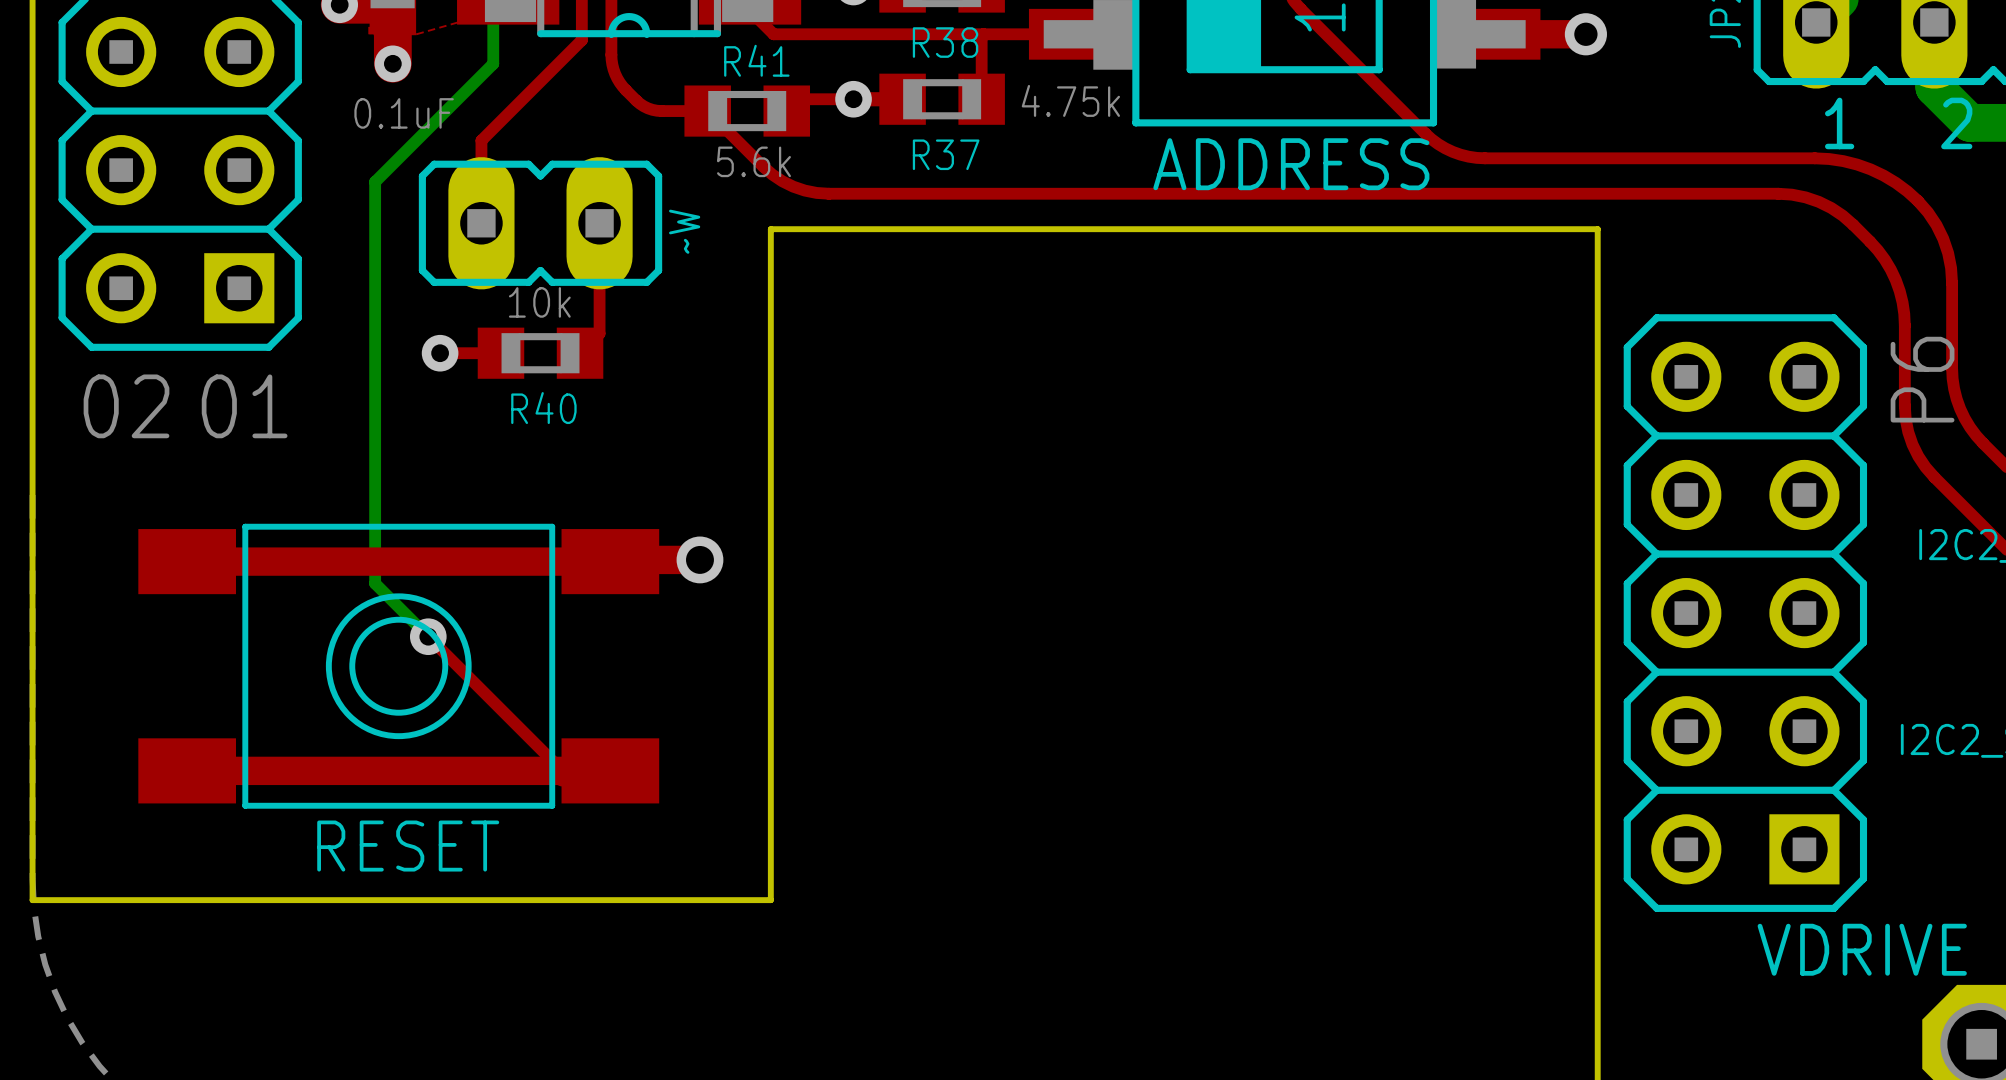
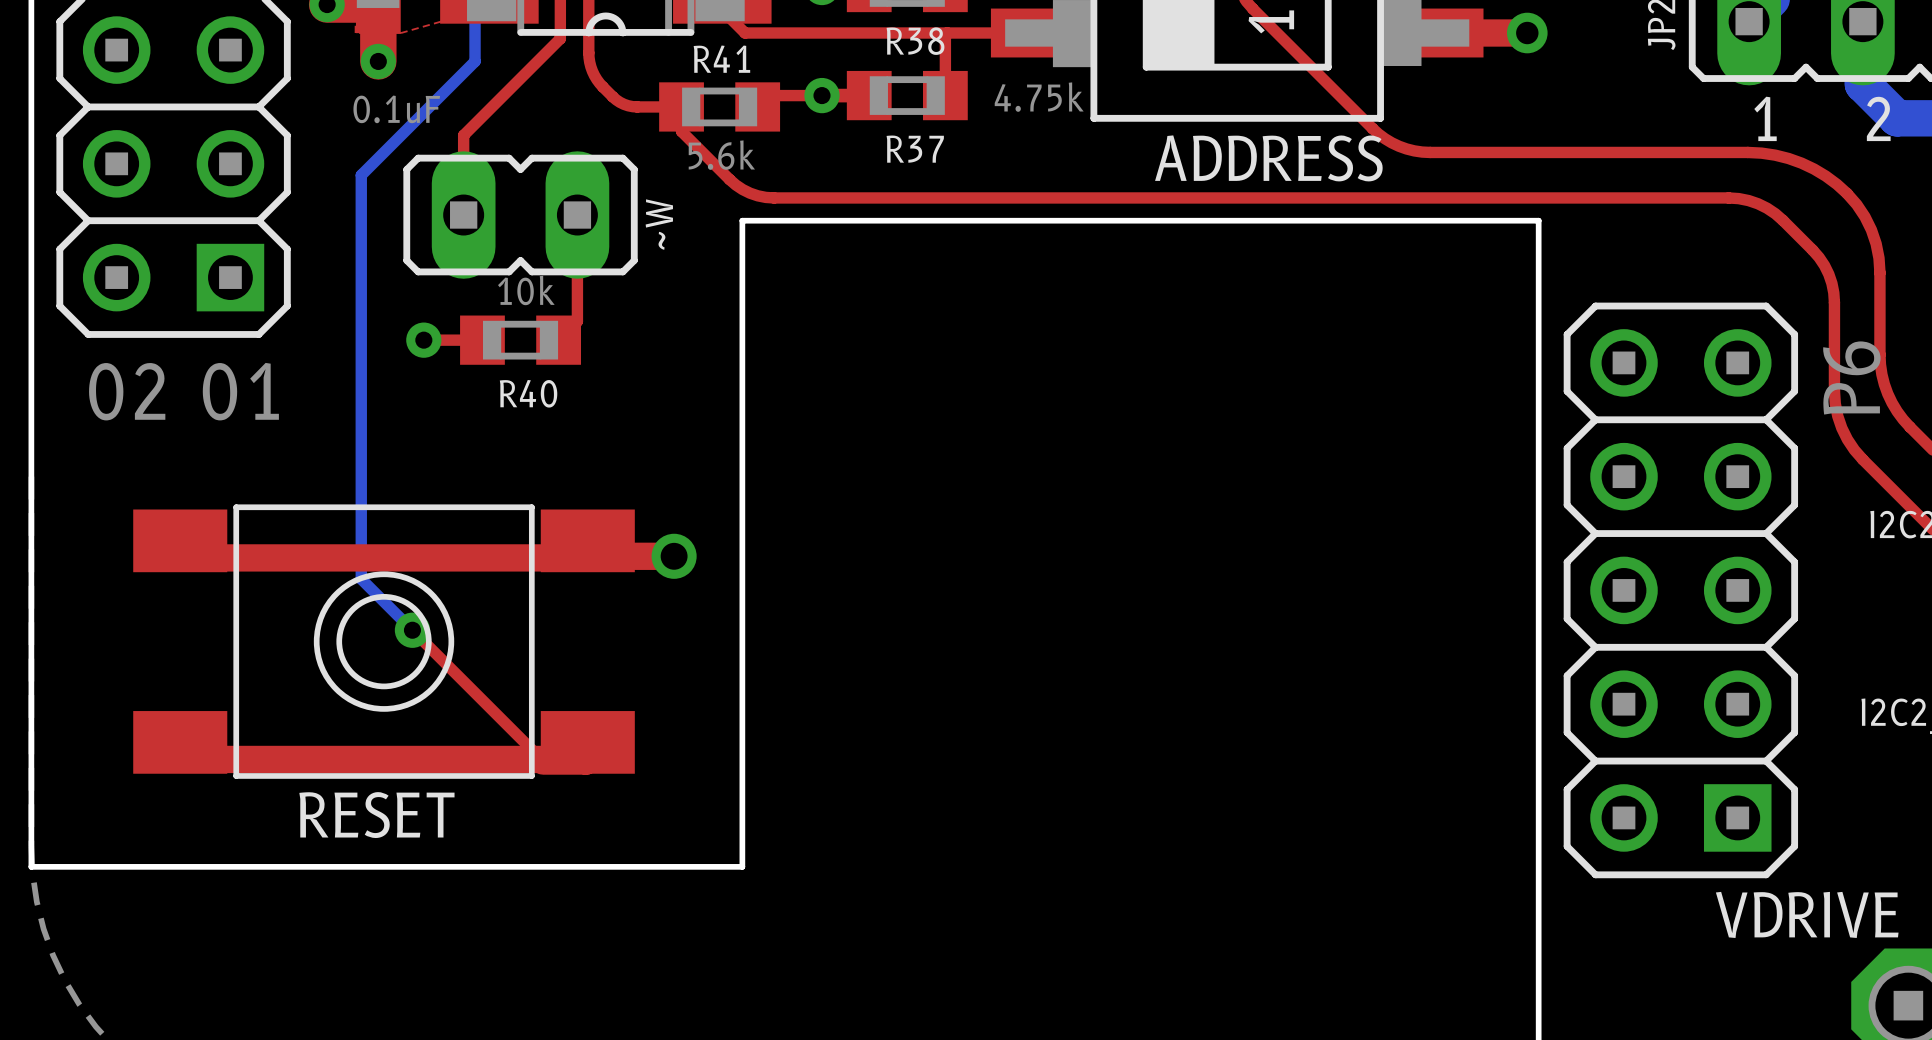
top track: (707, 111) (772, 174) (793, 186) (816, 192) (1791, 194) (1805, 197) (1831, 207) (1853, 224) (1877, 250) (1895, 280) (1902, 302) (1904, 325) -> (681, 106) (681, 131) (735, 184) (750, 193) (765, 197) (1738, 198) (1758, 203) (1775, 213) (1819, 257) (1831, 283) (1834, 313)
top track: (699, 559) (187, 561) -> (674, 556) (180, 557)
via position: (699, 559) -> (674, 556)
bottom track: (375, 583) (428, 636) -> (361, 561) (361, 579) (412, 630)
top track: (428, 636) (564, 772) (608, 772) (610, 770) (187, 770) -> (412, 630) (543, 761) (586, 761) (587, 759) (180, 759)
via position: (428, 636) -> (412, 630)

